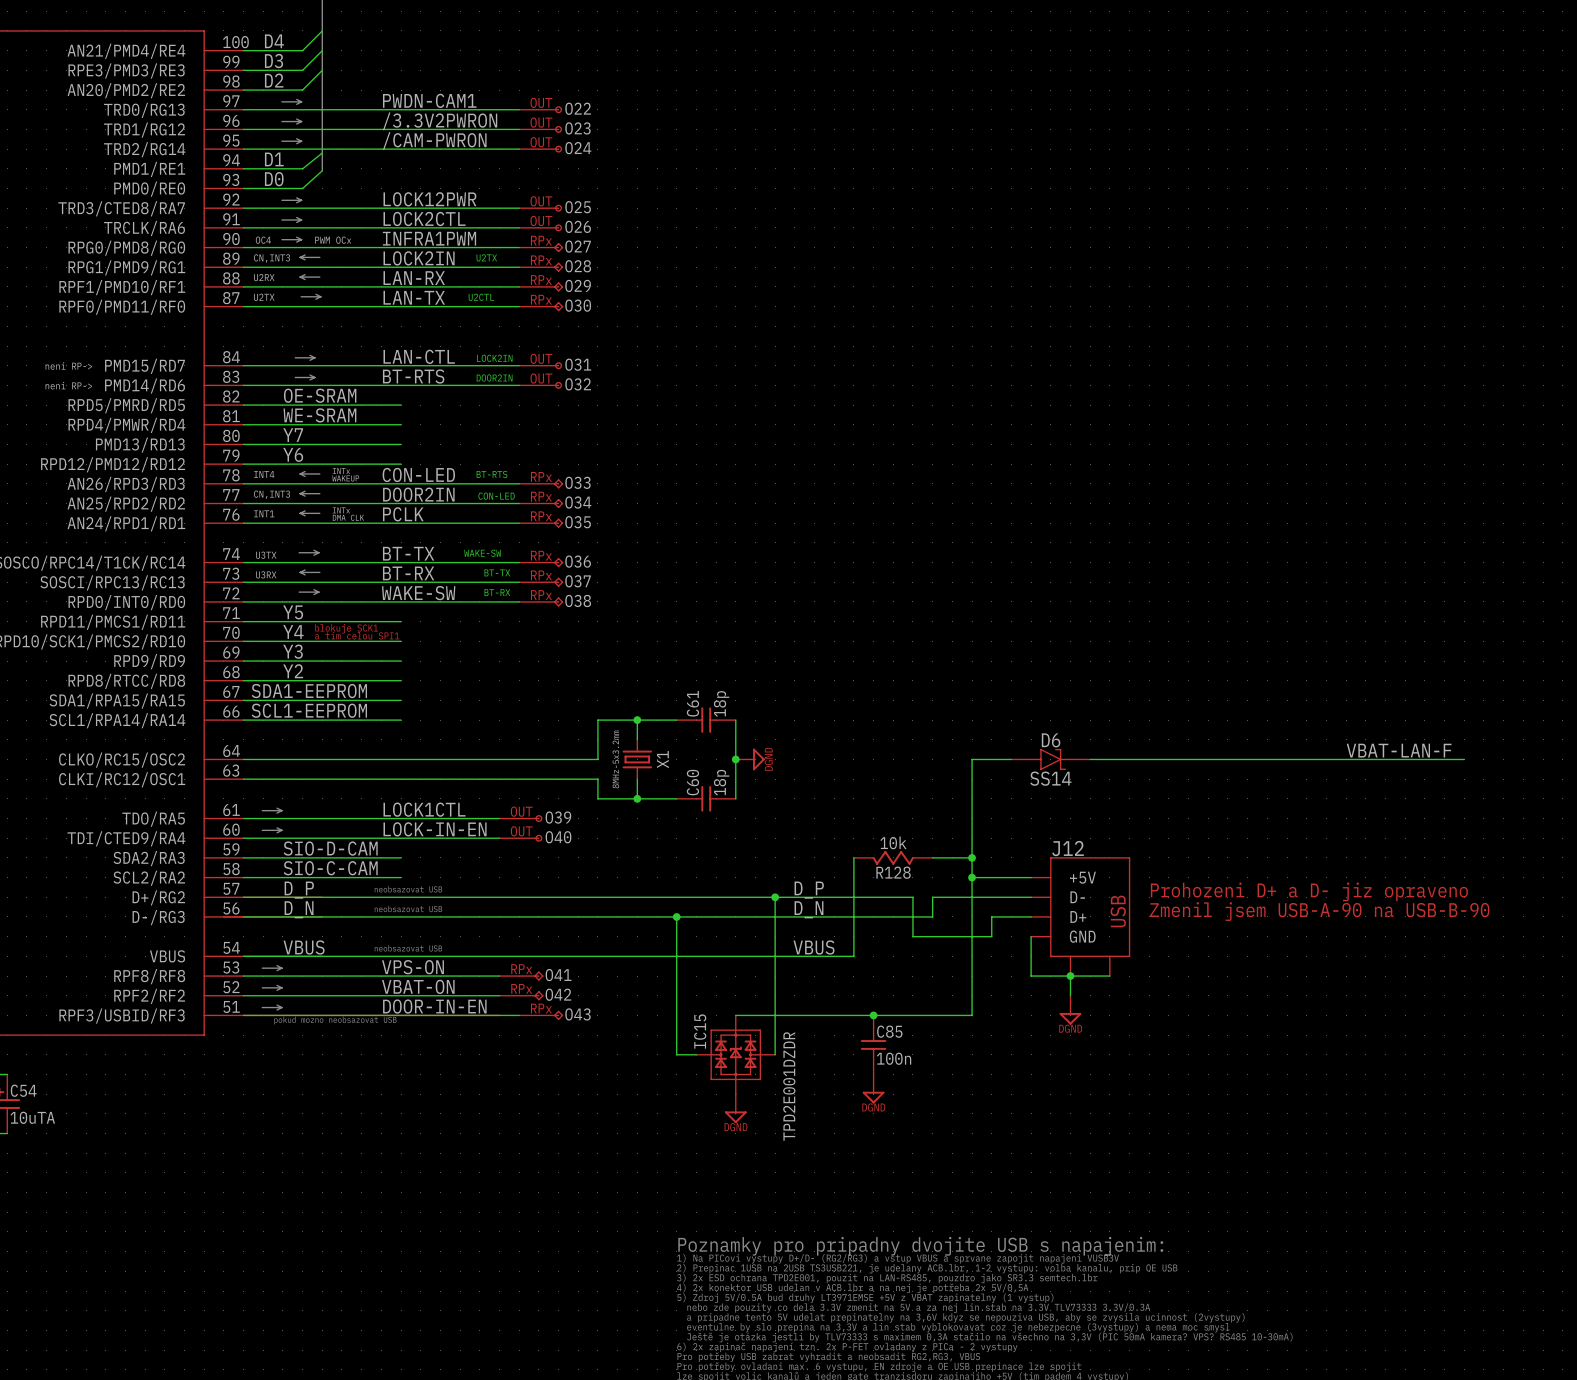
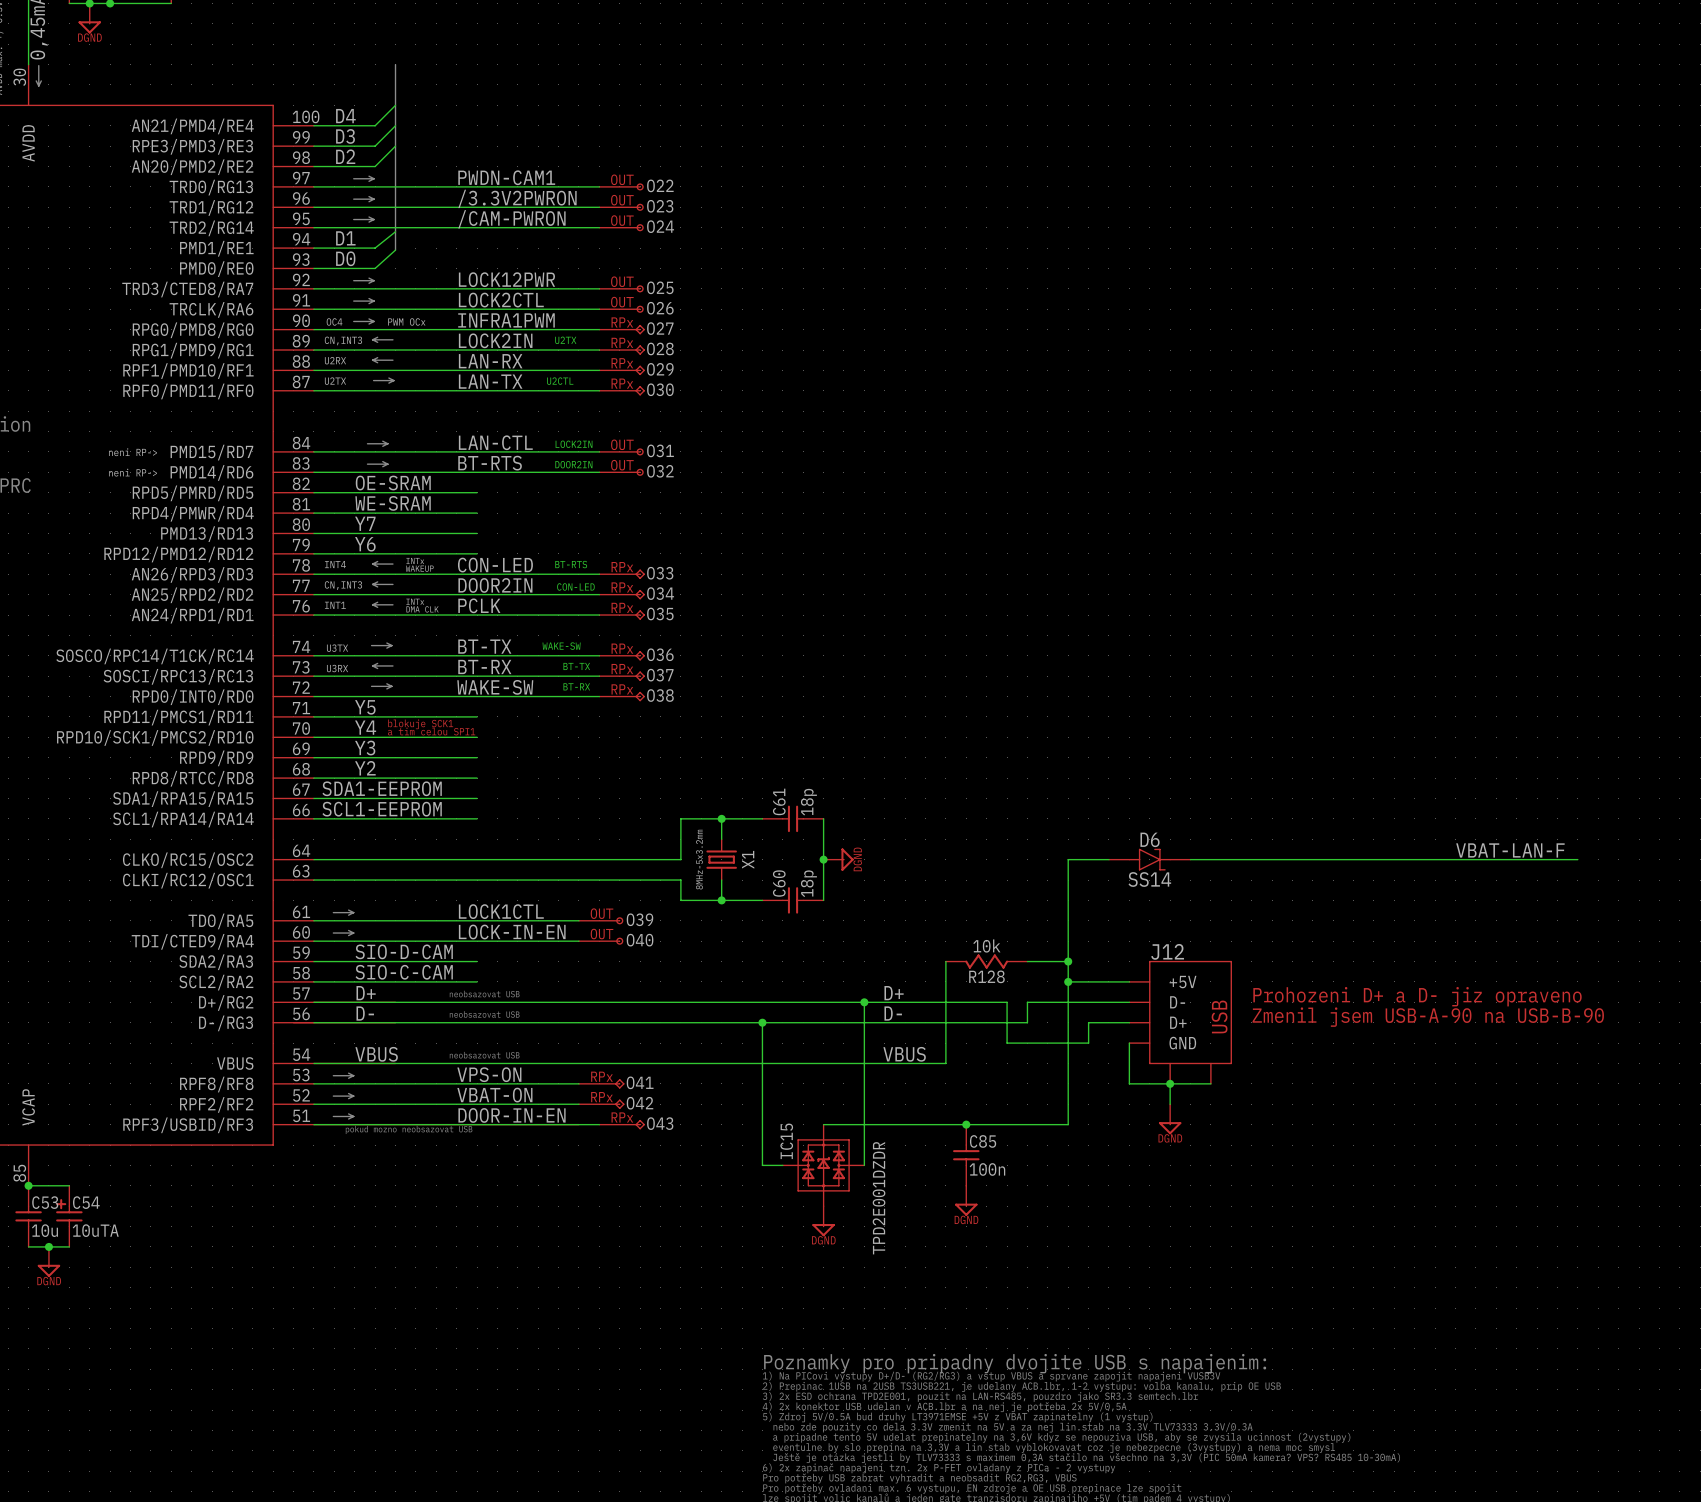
label: D_P (299, 890) -> D+ (366, 993)
label: D_P (809, 890) -> D+ (894, 993)
label: D_N (299, 909) -> D- (365, 1013)
label: D_N (809, 909) -> D- (893, 1013)

